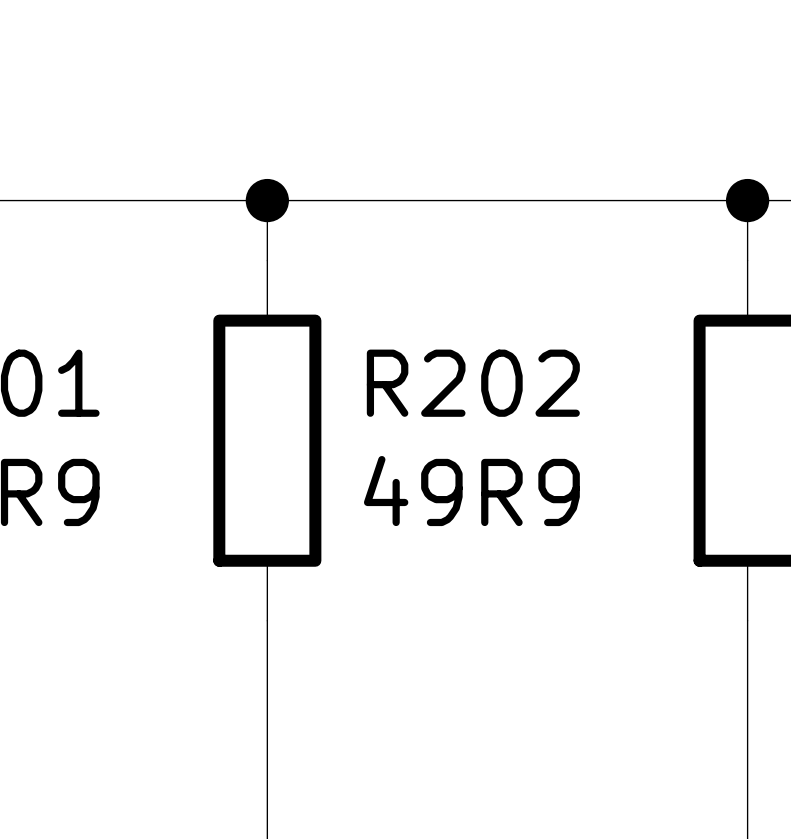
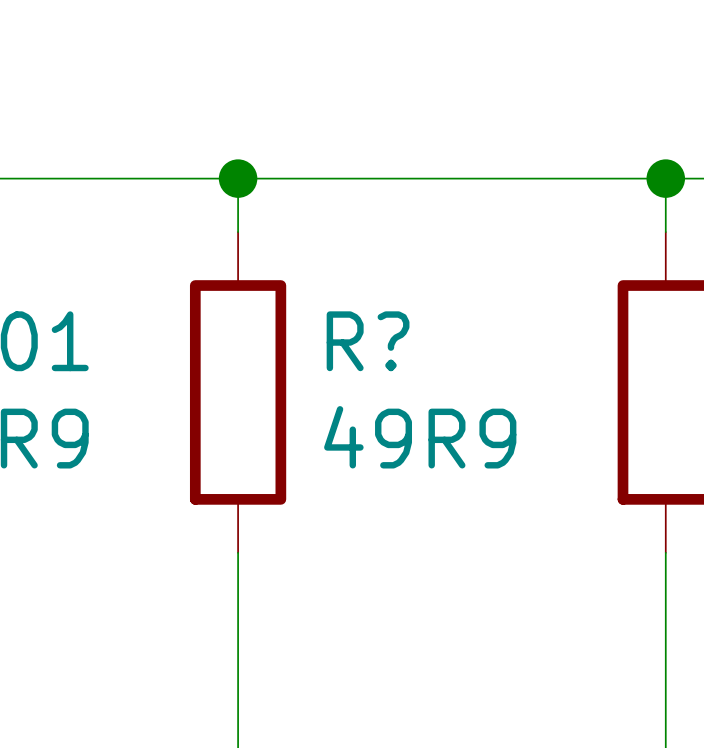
R202 name: R202 (473, 383) -> R? (368, 341)

